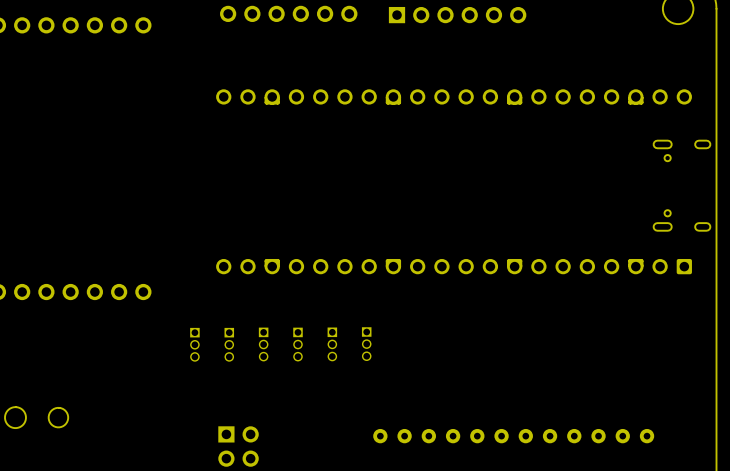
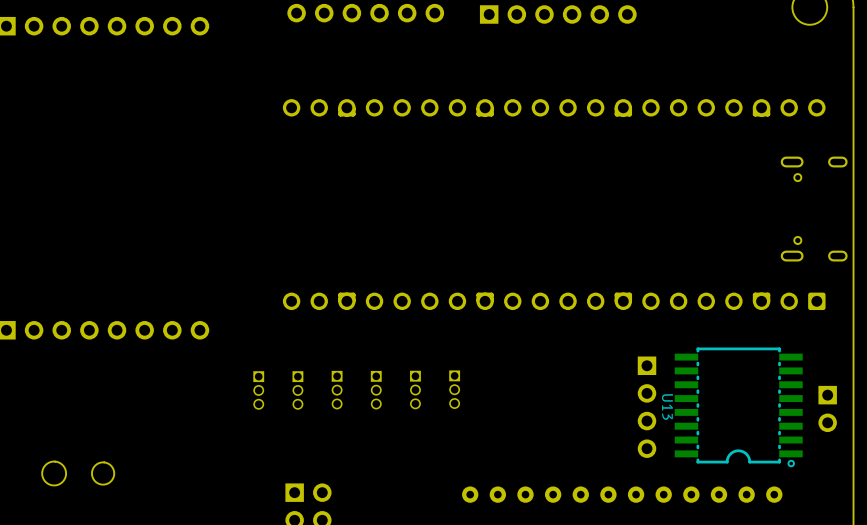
part: none -> (647, 407)
U13: none -> (738, 407)
part: none -> (827, 408)

